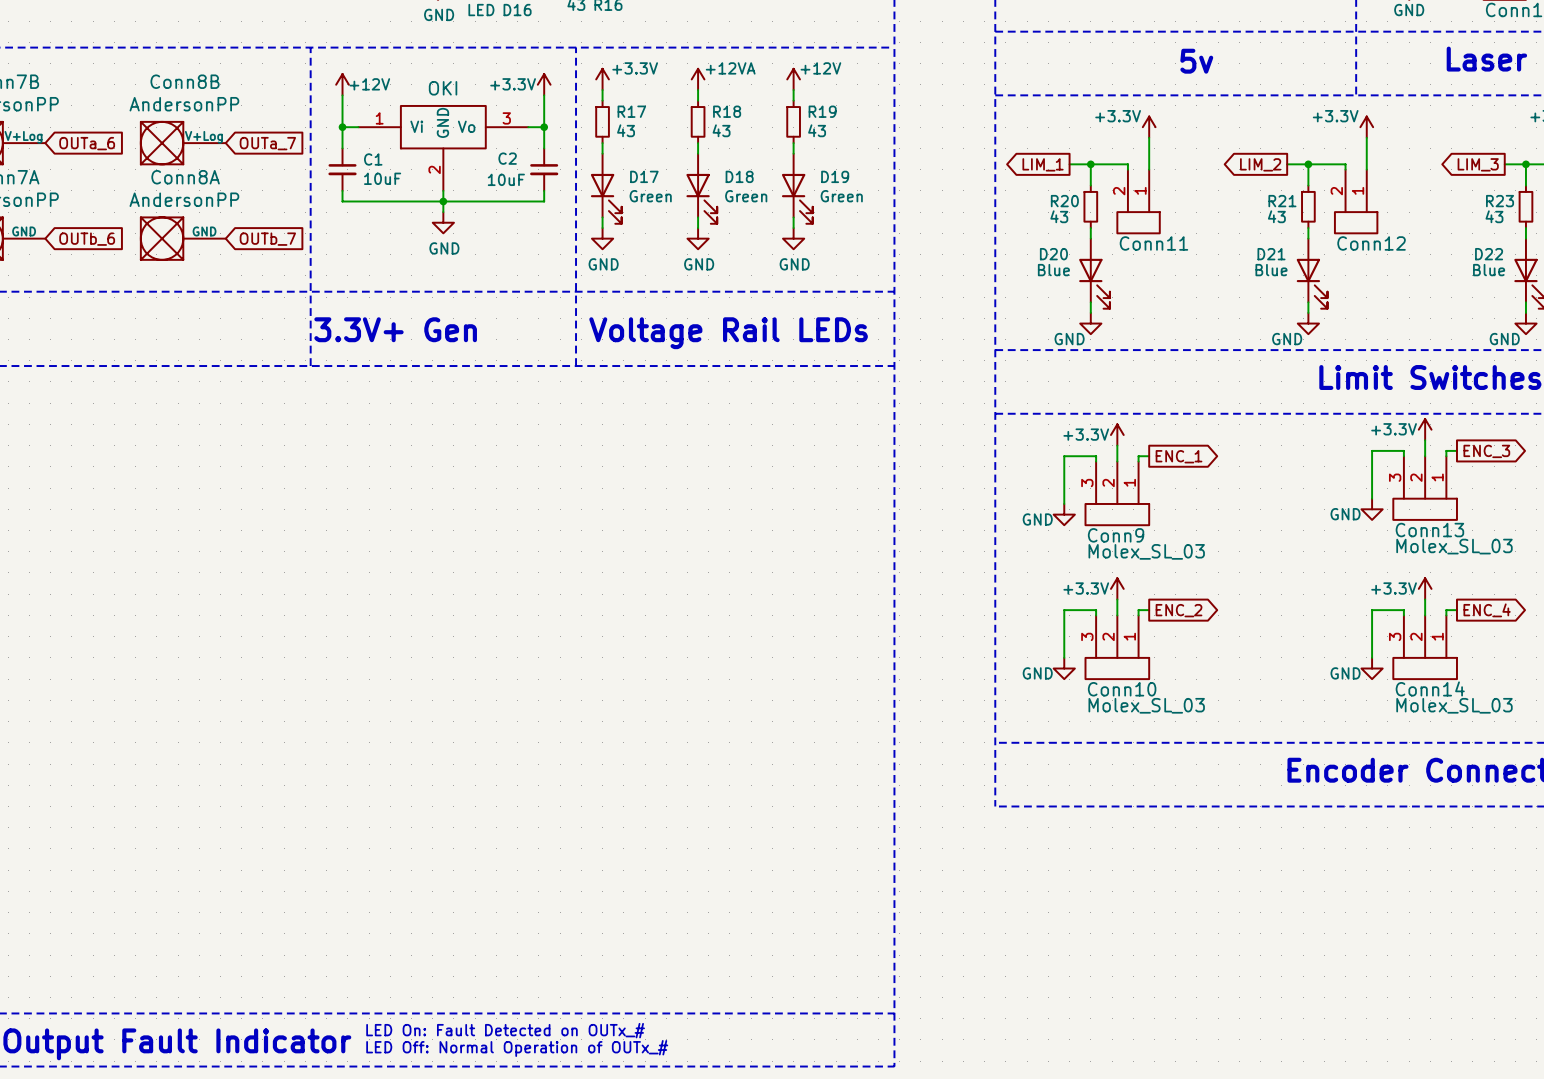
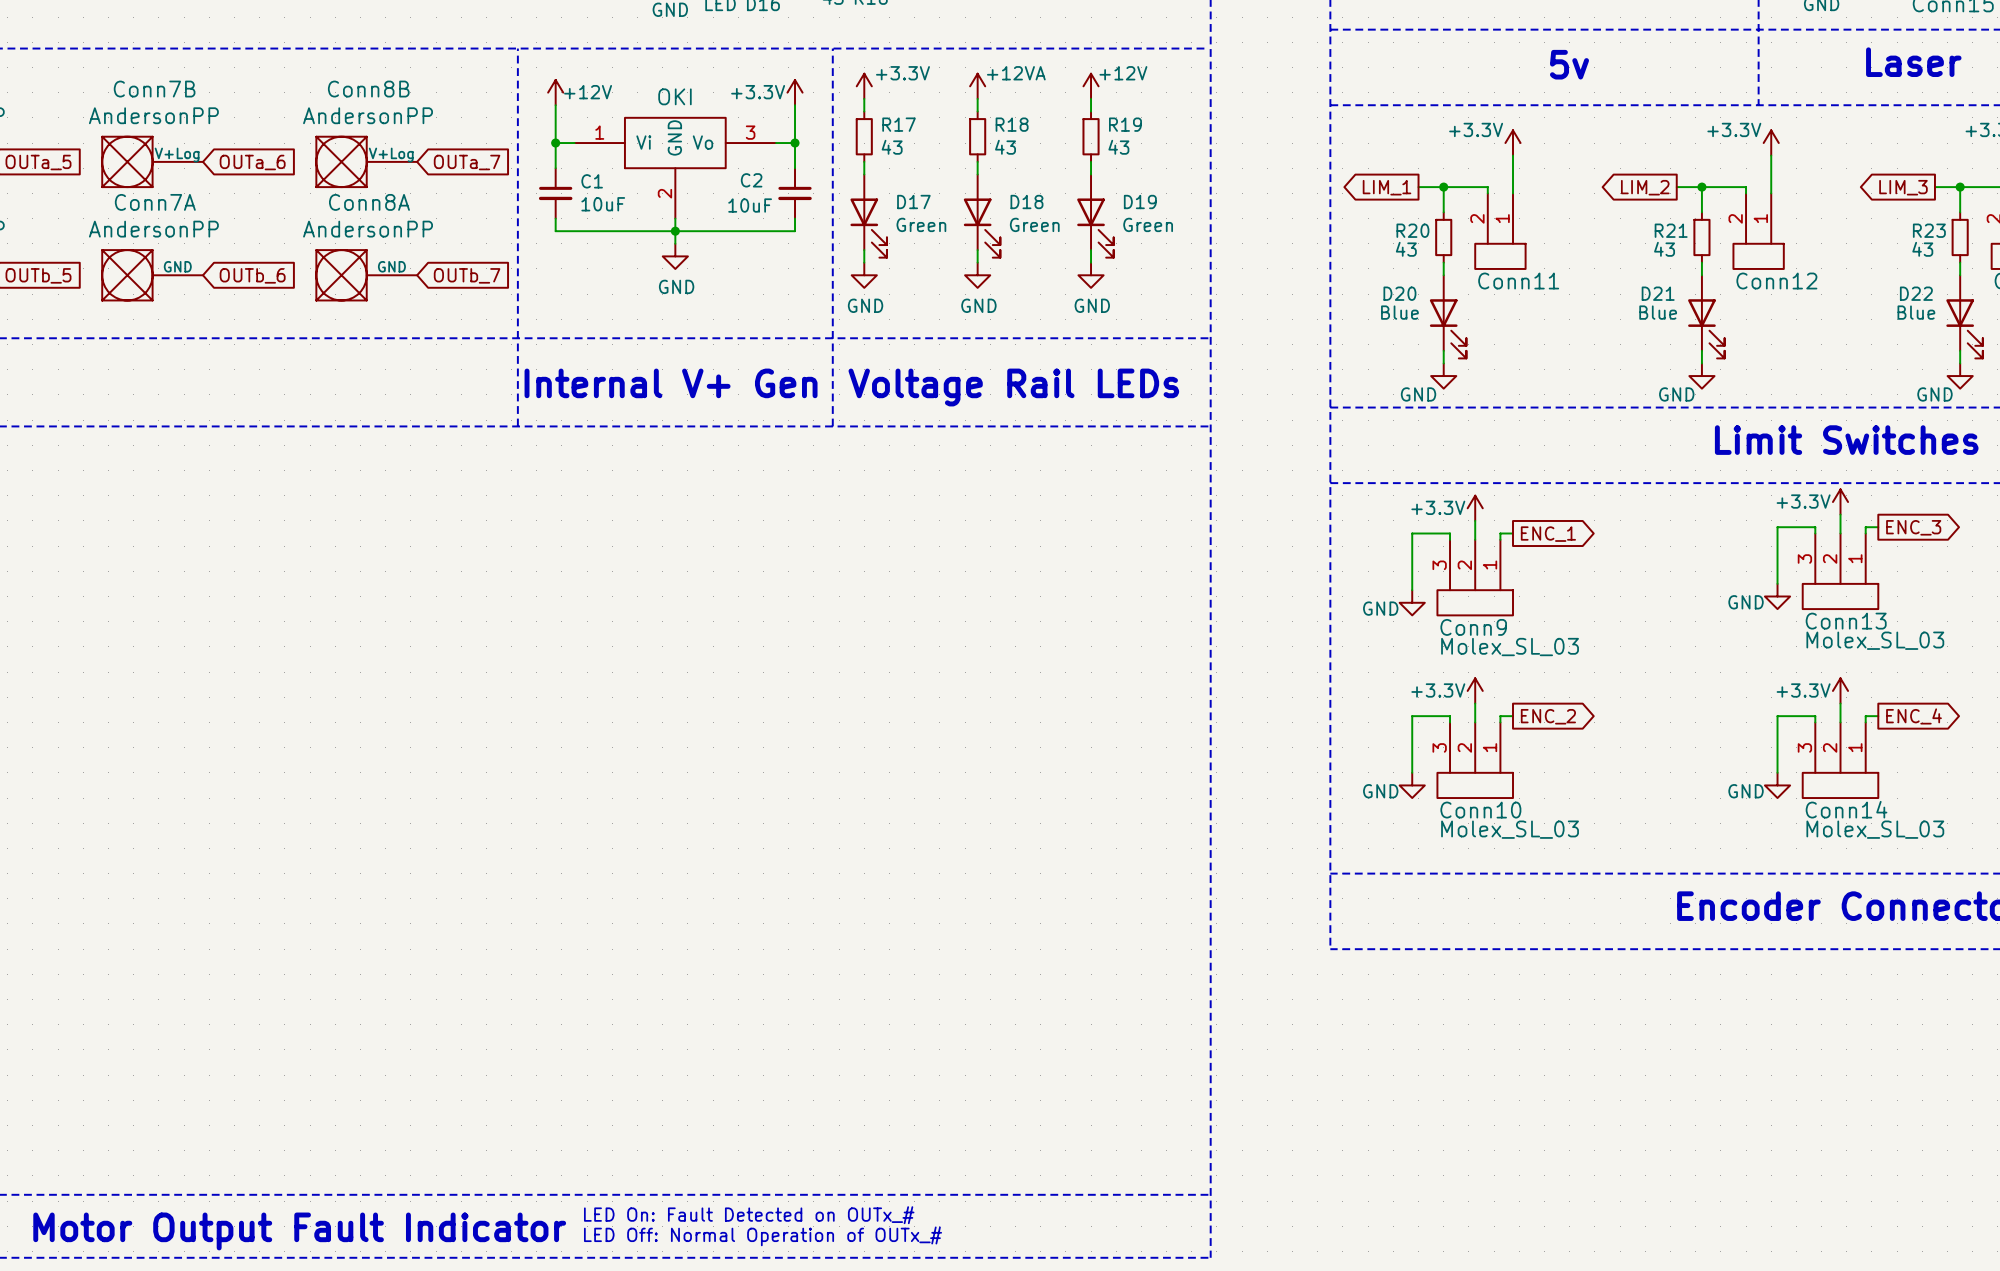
text: 3.3V+ Gen (395, 329) -> Internal V+ Gen (671, 383)

